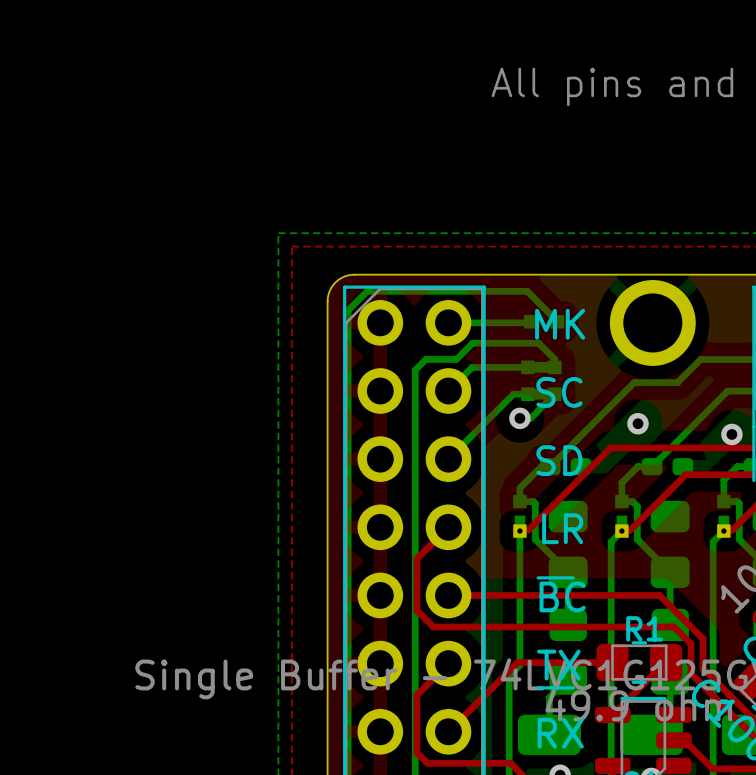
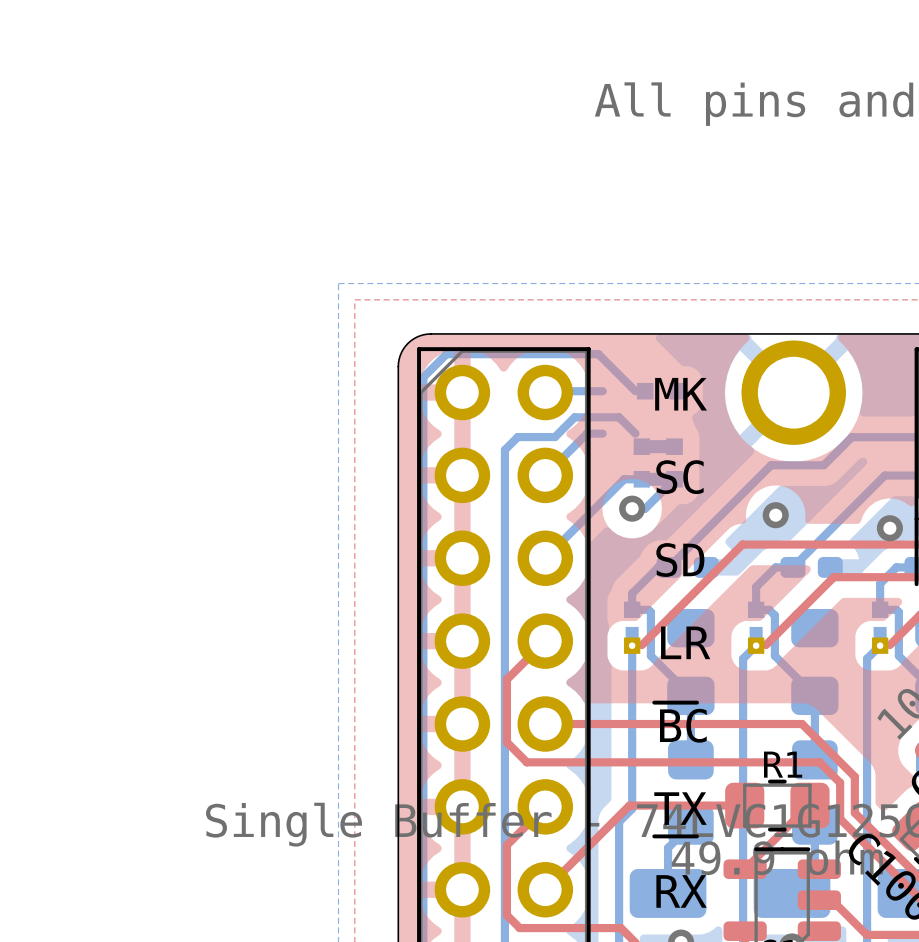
bottom track: (492, 291) (527, 291) (557, 321) -> (598, 354) (635, 391)
bottom track: (530, 321) (448, 322) -> (602, 391) (545, 392)
bottom track: (509, 343) (538, 343) (554, 359) (554, 367) -> (619, 417) (635, 433)
bottom track: (472, 367) (527, 367) -> (574, 446) (587, 433) (602, 433)

